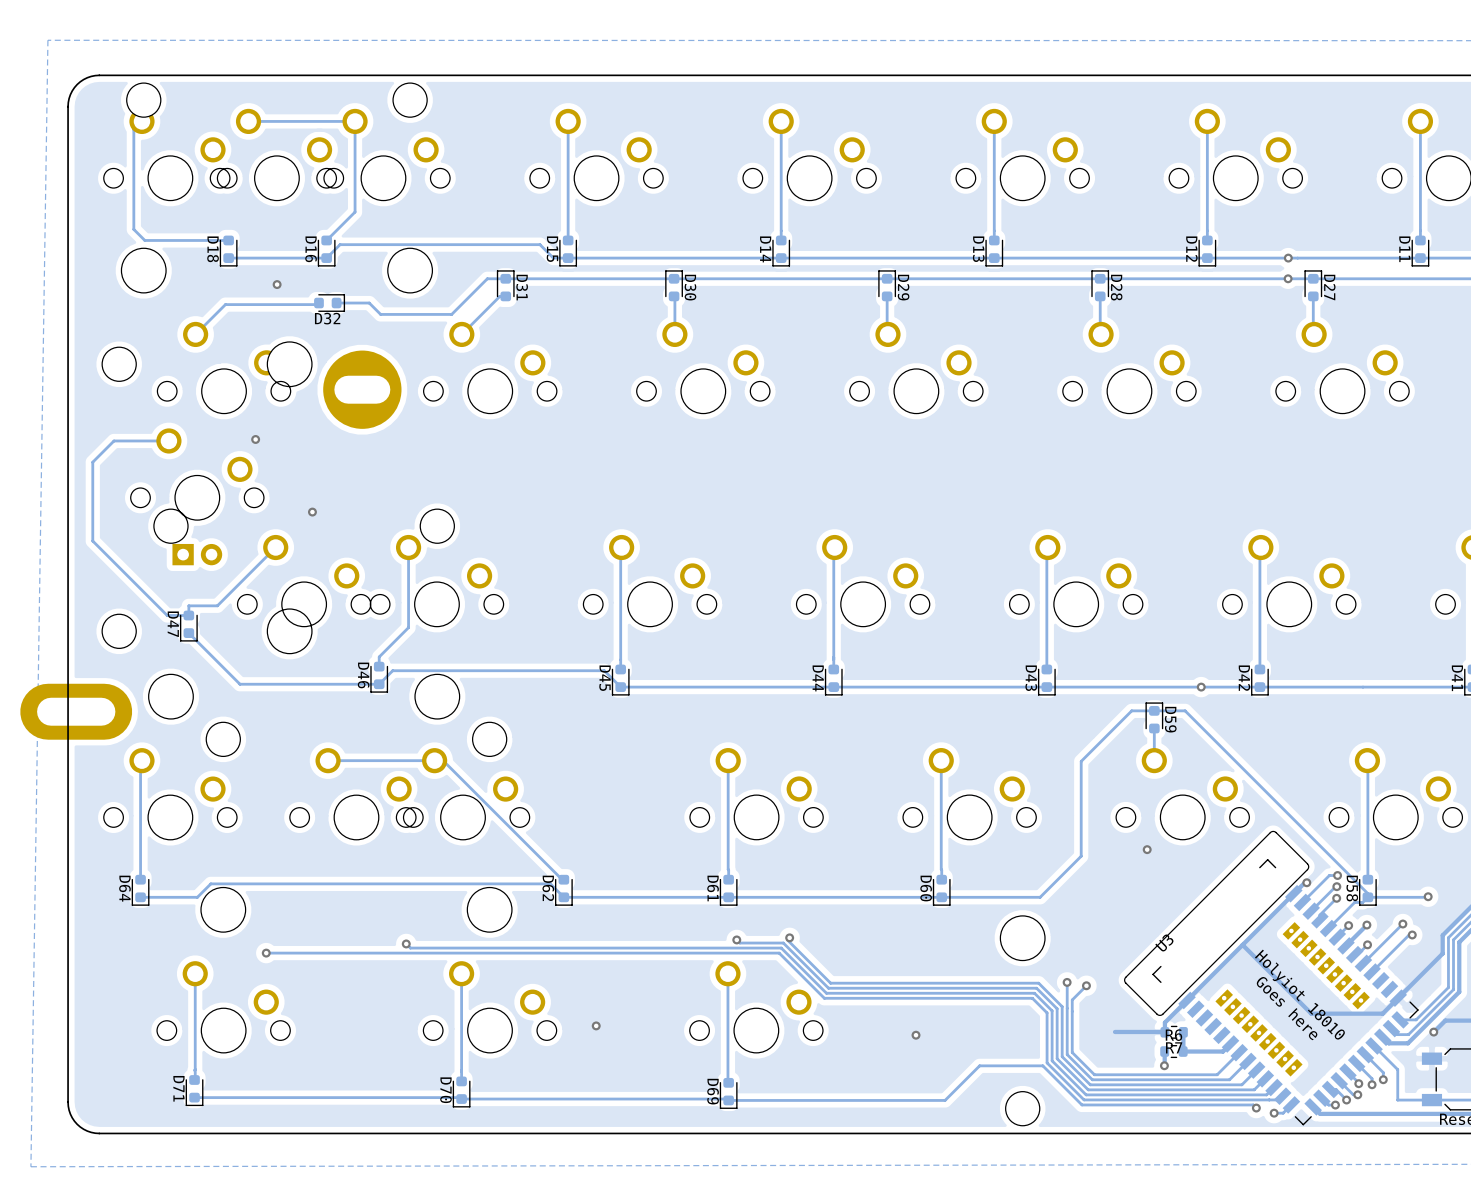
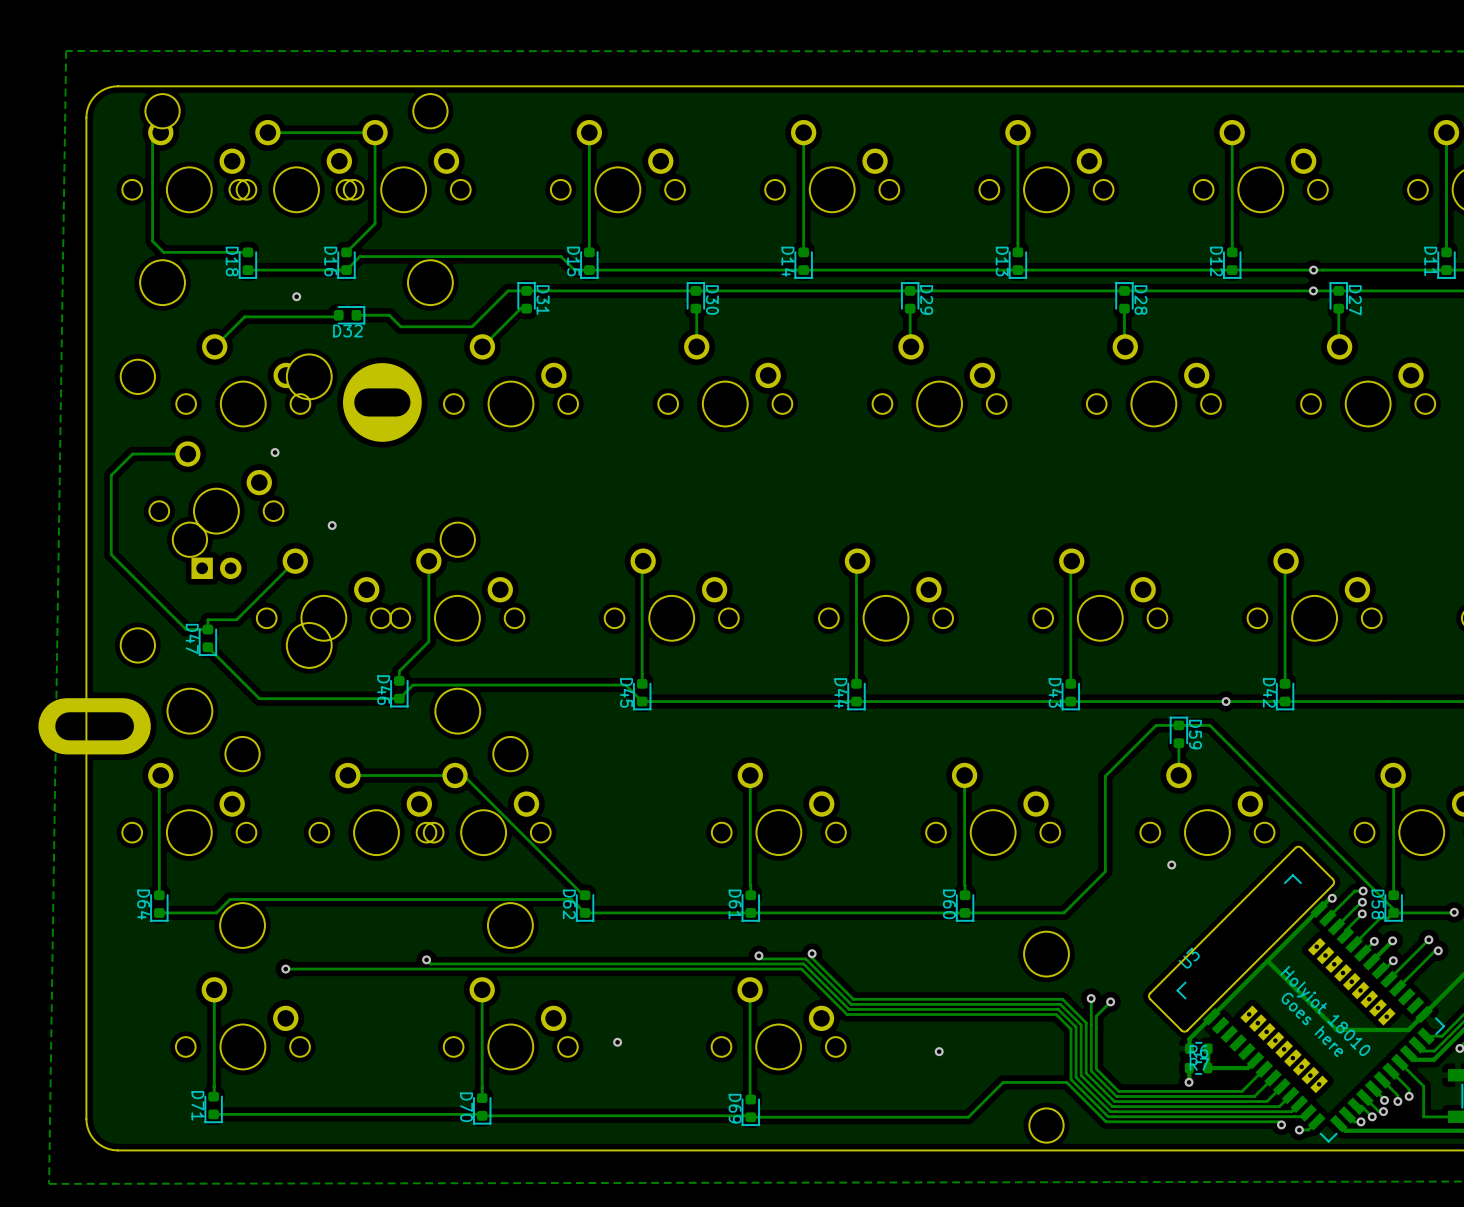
track: (1164, 1031) (1115, 1031) -> none

